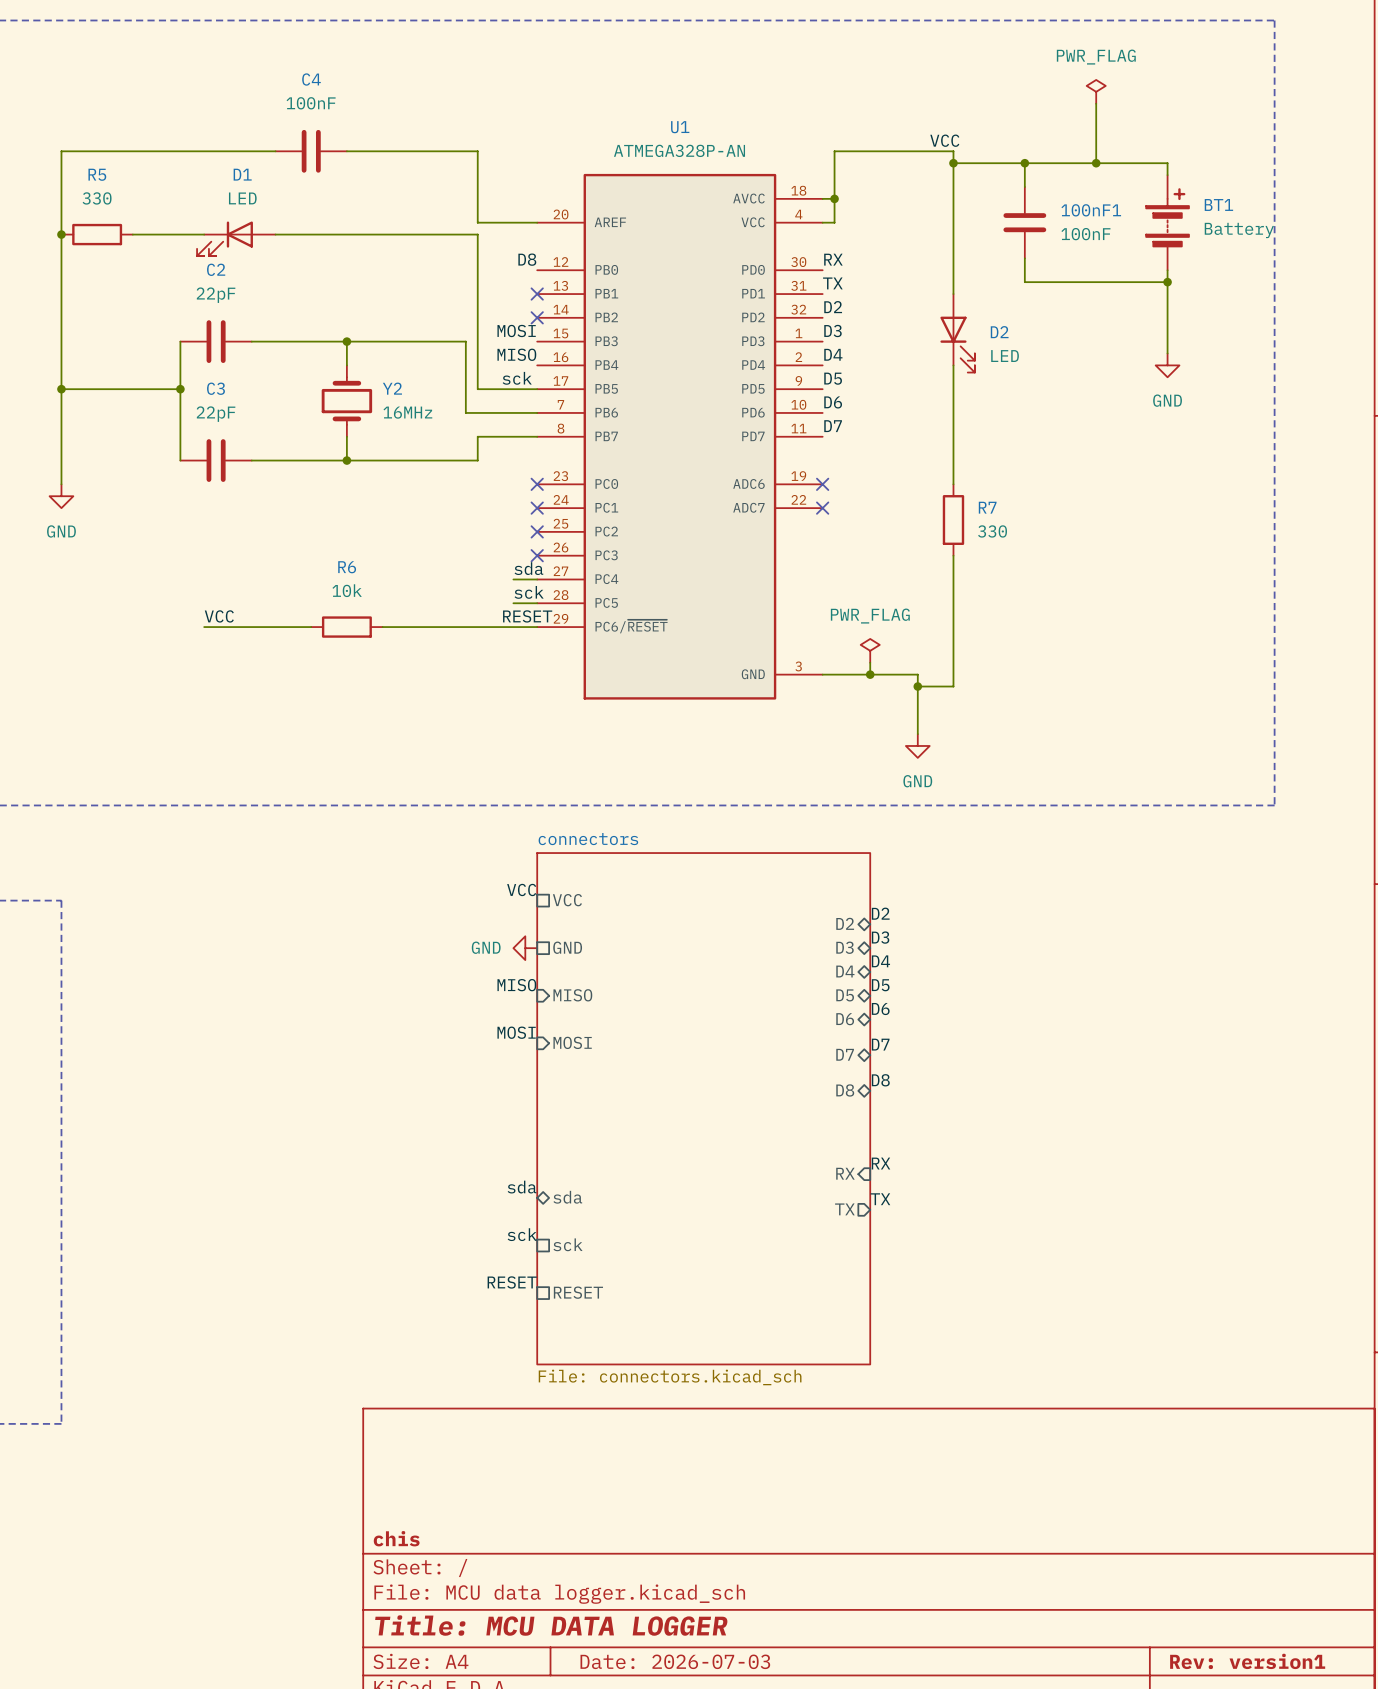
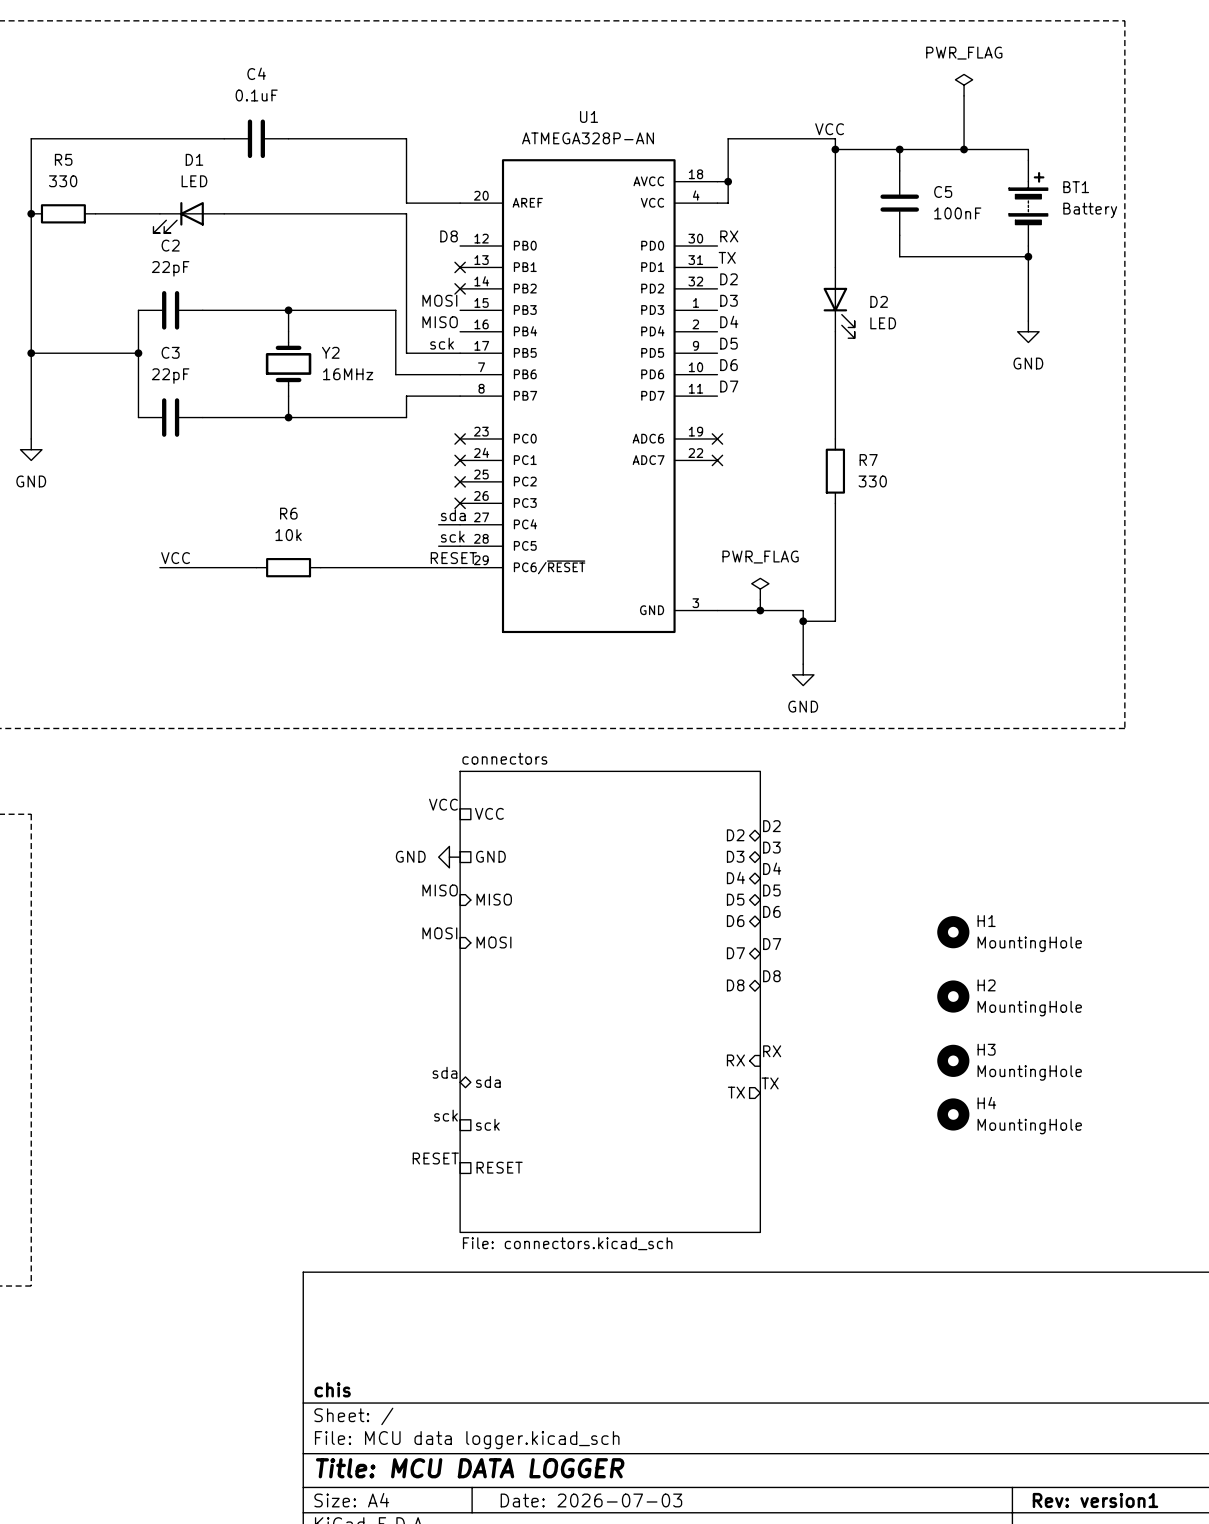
C4 value: 100nF (311, 103) -> 0.1uF (256, 95)
100nF1 name: 100nF1 (1091, 210) -> C5 (943, 191)
H1: none -> MountingHole (953, 932)
H2: none -> MountingHole (953, 996)
H3: none -> MountingHole (953, 1060)
H4: none -> MountingHole (953, 1114)

